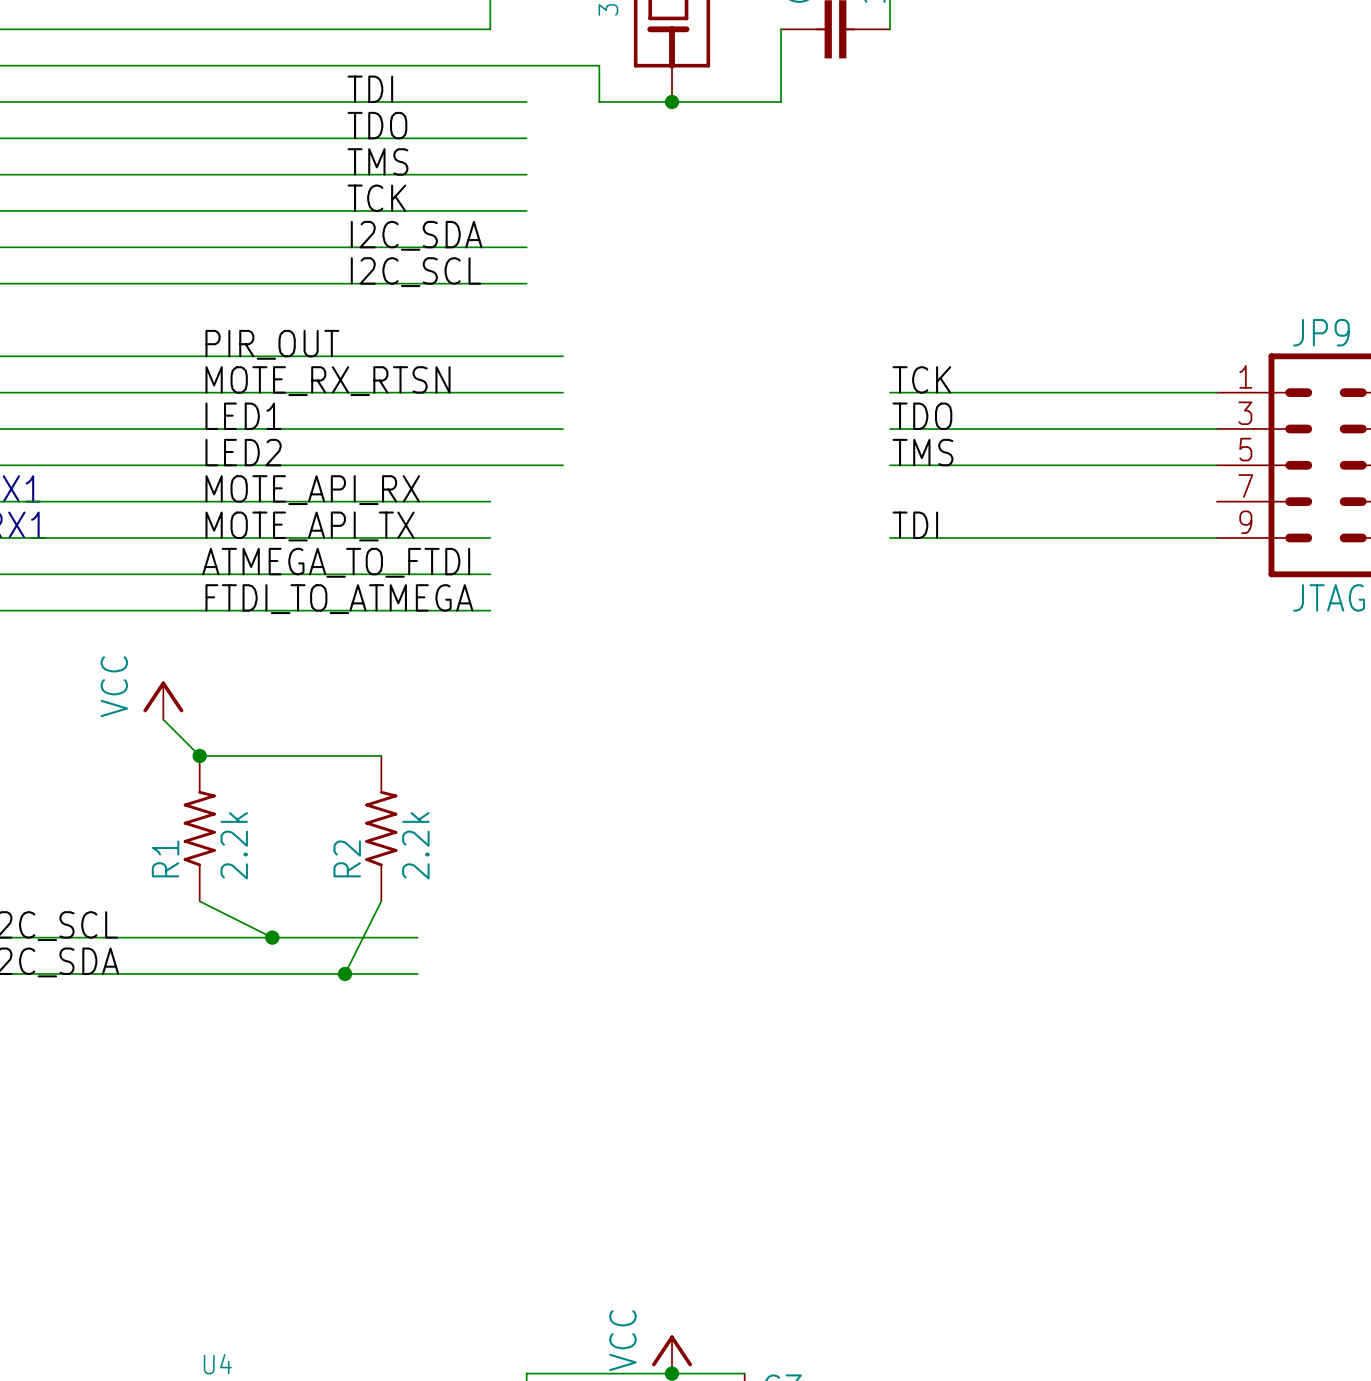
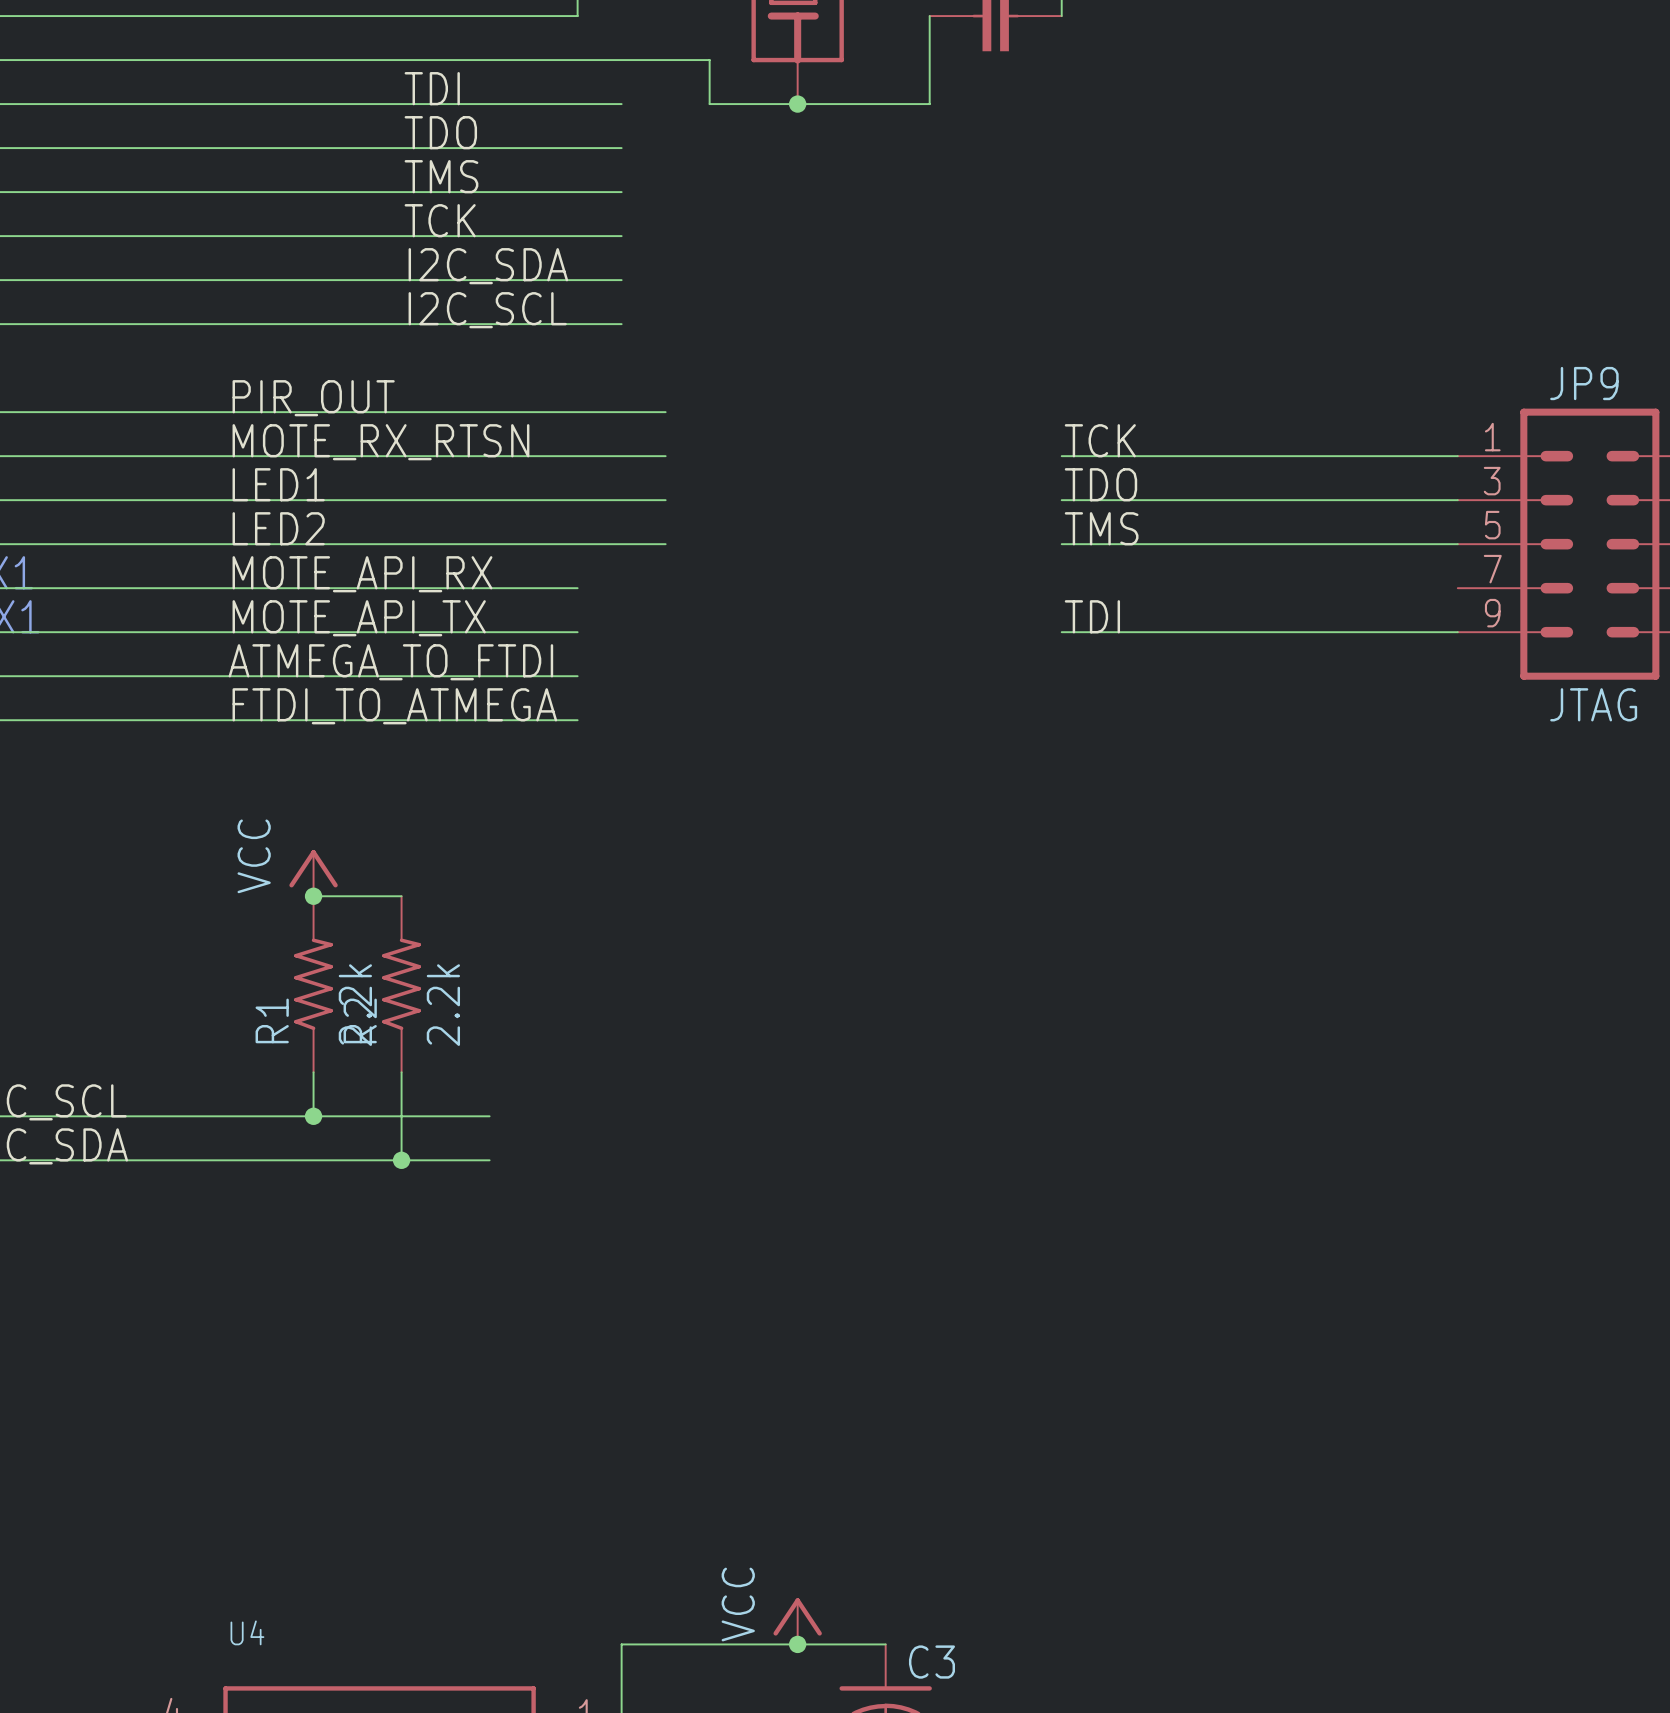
power symbol position: VCC (163, 700) -> VCC (313, 873)
wire: (163, 719) (199, 755) (272, 755) -> none
junction position: (199, 755) -> (313, 896)
wire: (345, 755) (381, 755) -> none
R1 position: (199, 828) -> (313, 984)
R2 position: (381, 828) -> (401, 984)
wire: (199, 901) (272, 937) -> (313, 1072) (313, 1116)
wire: (381, 901) (345, 973) -> (401, 1072) (401, 1160)

